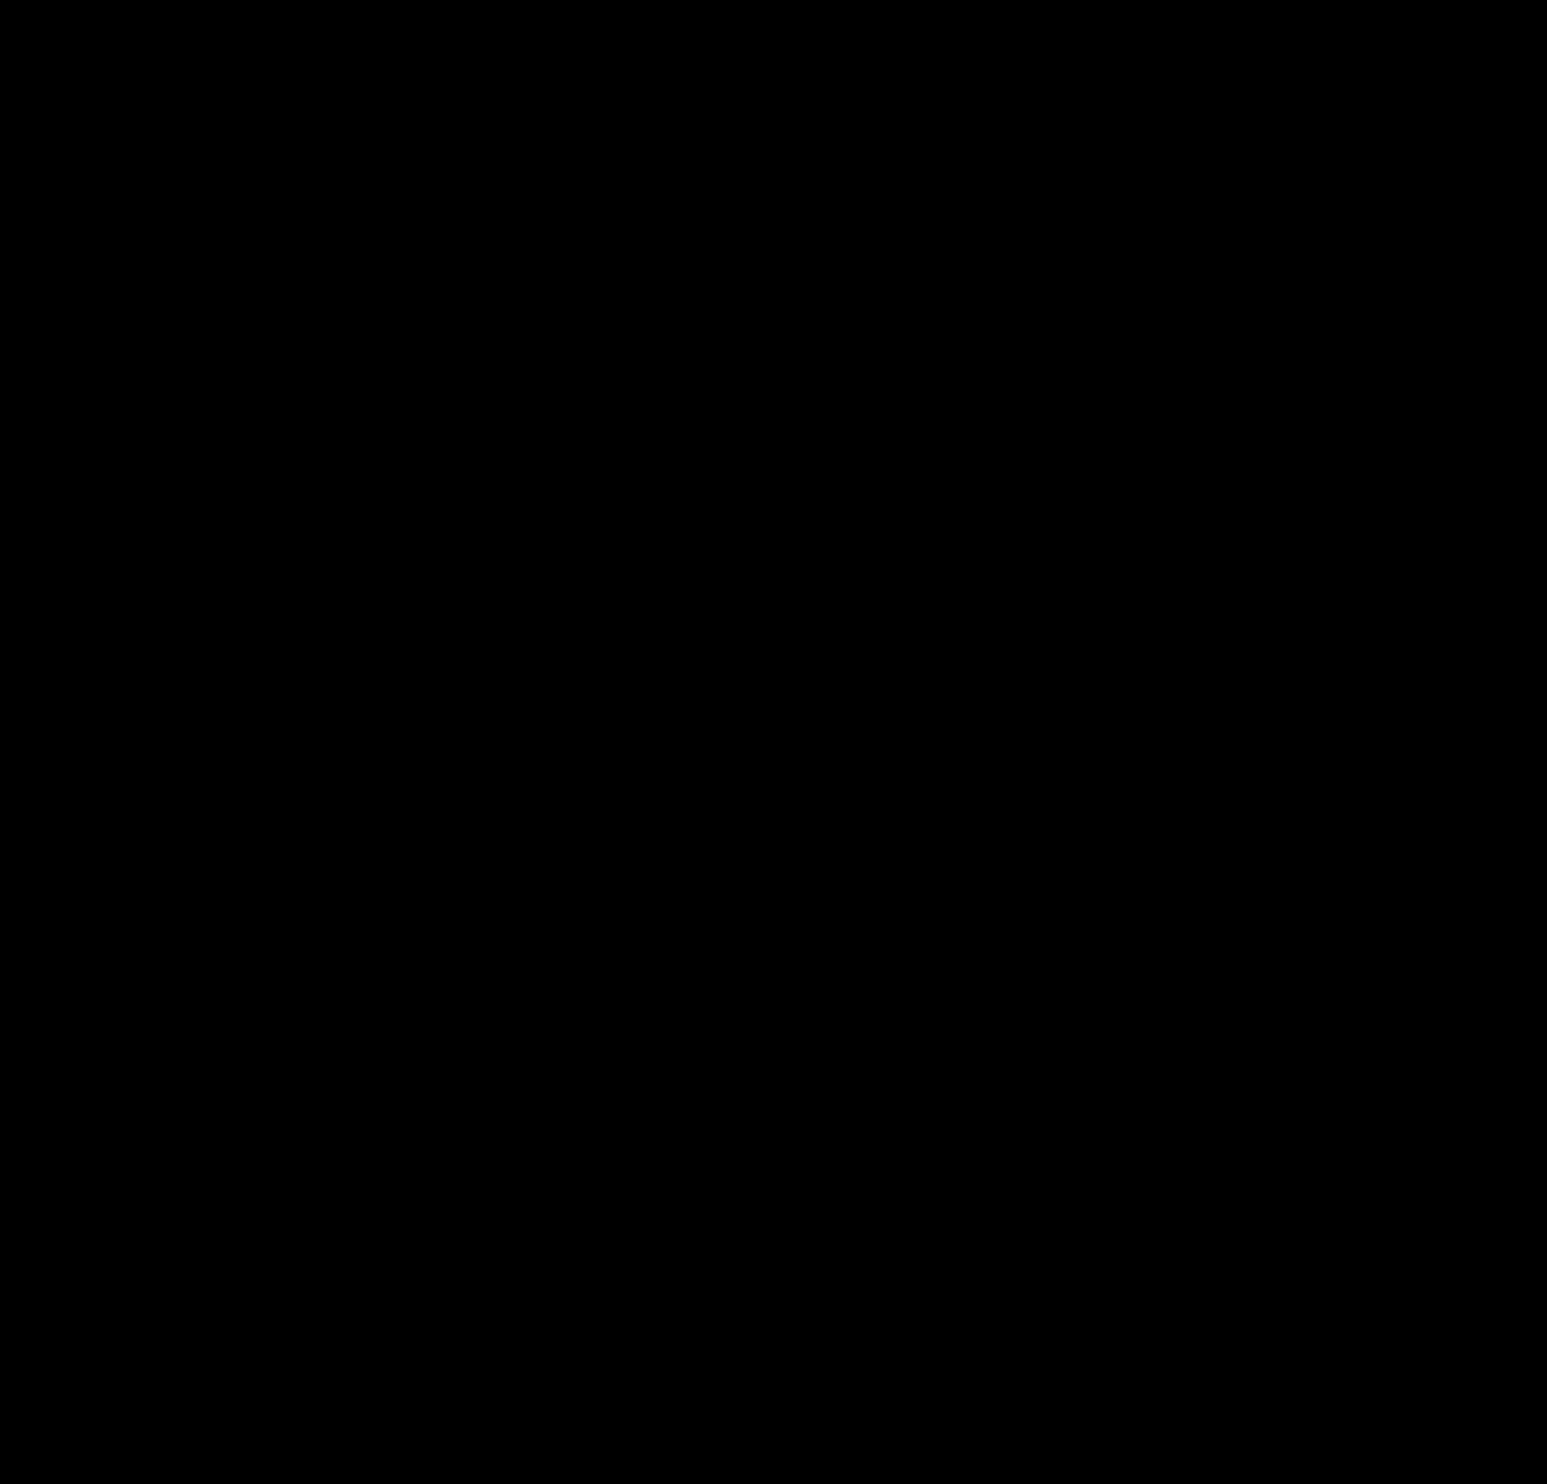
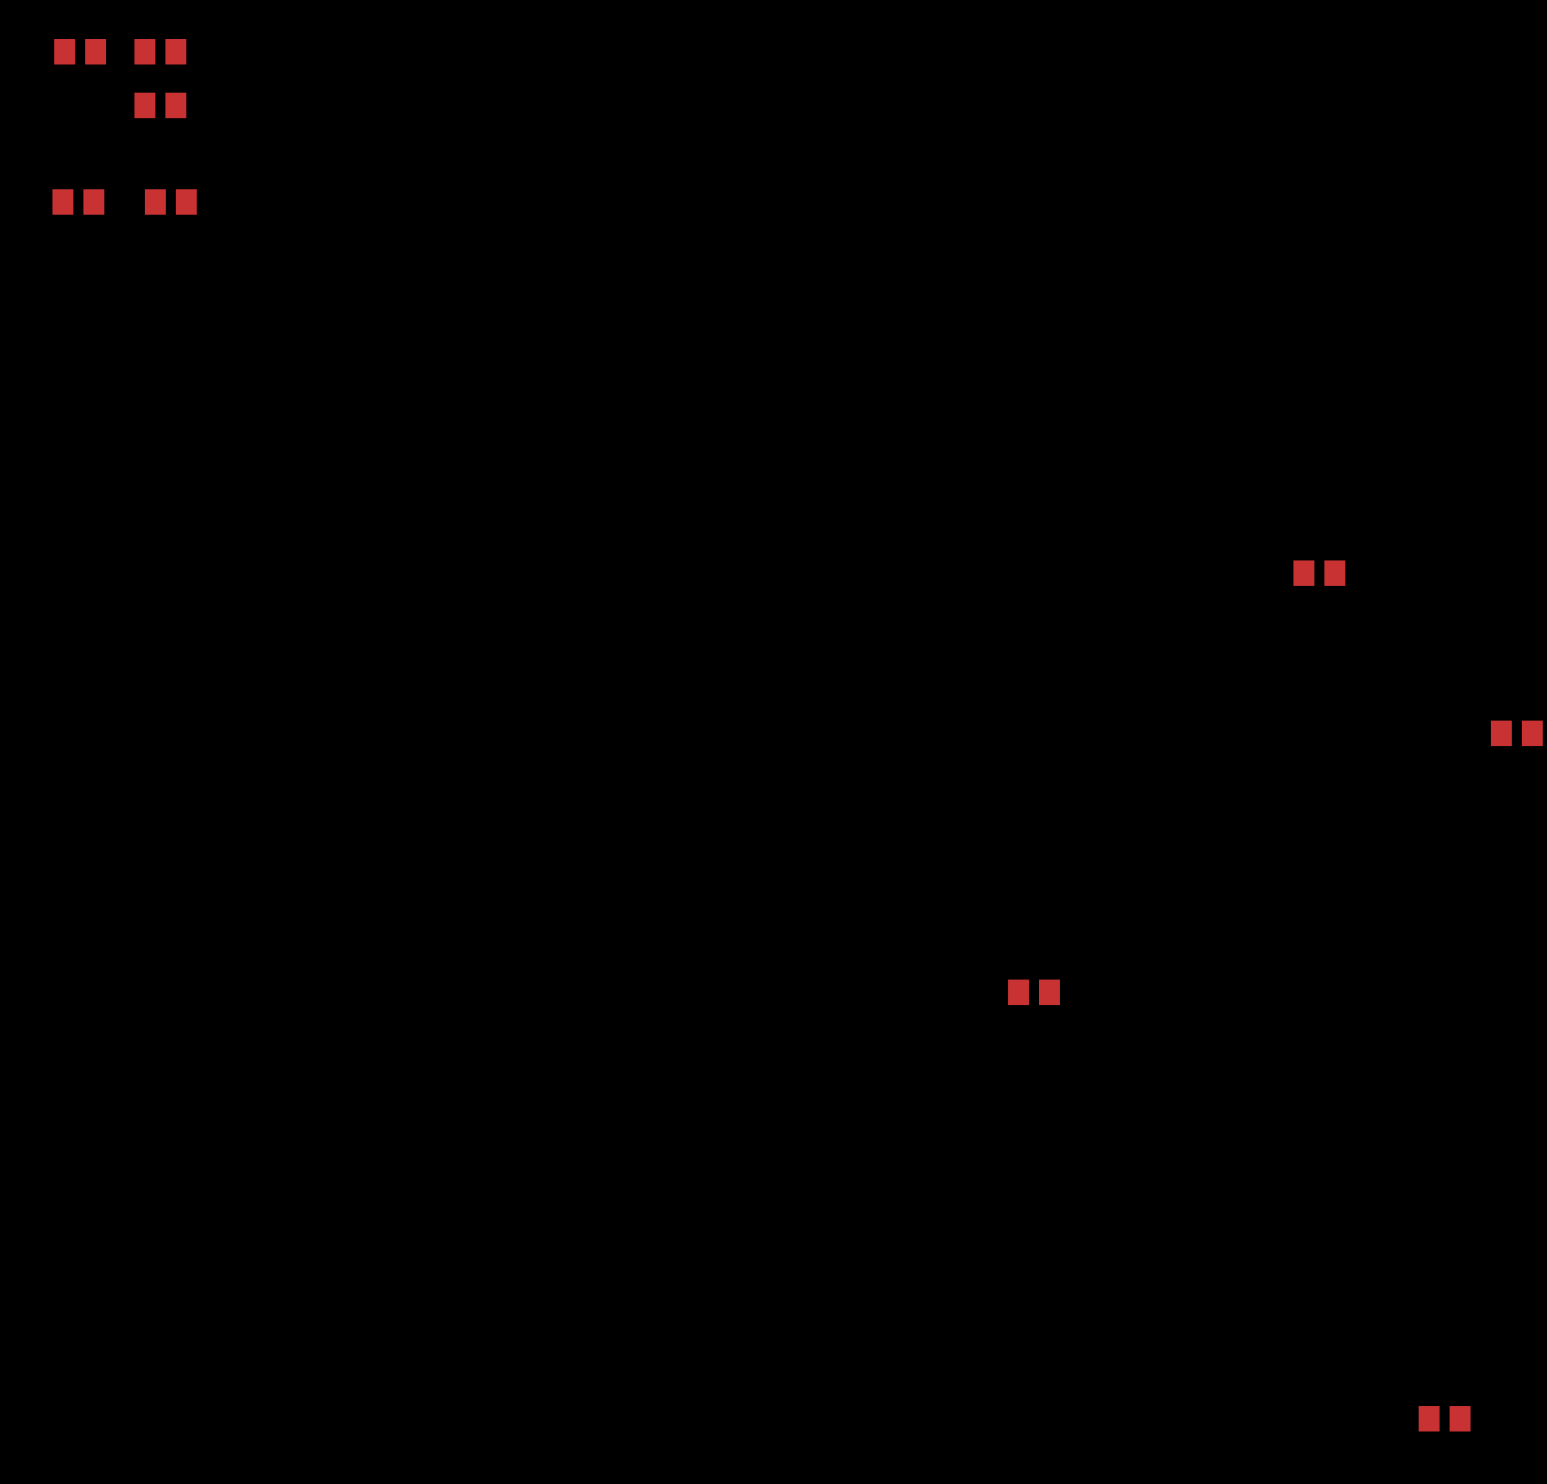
part: none -> (80, 51)
part: none -> (160, 51)
part: none -> (160, 105)
part: none -> (78, 201)
part: none -> (170, 201)
part: none -> (1319, 573)
part: none -> (1516, 733)
part: none -> (1033, 992)
part: none -> (1444, 1418)

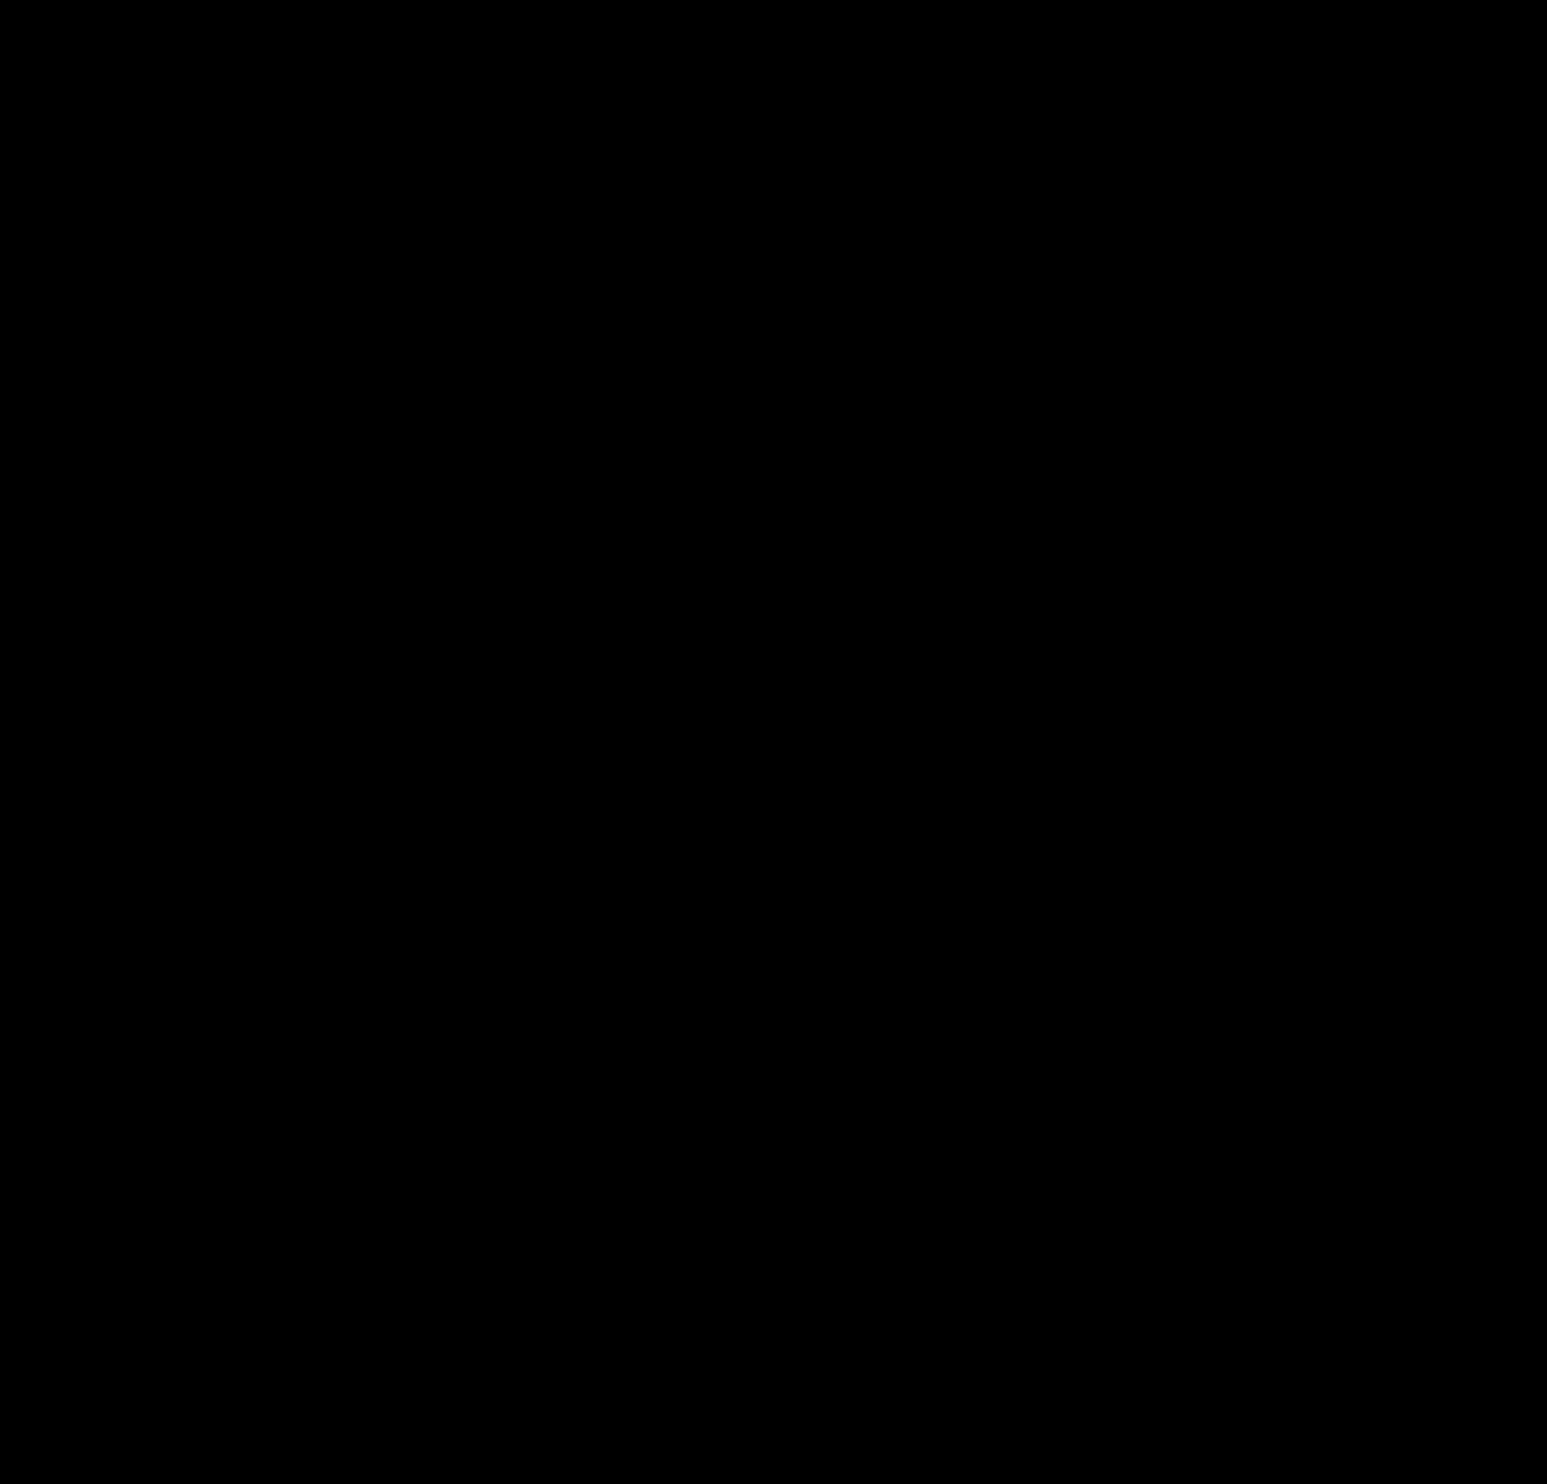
part: (80, 51) -> none
part: (160, 51) -> none
part: (160, 105) -> none
part: (78, 201) -> none
part: (170, 201) -> none
part: (1319, 573) -> none
part: (1516, 733) -> none
part: (1033, 992) -> none
part: (1444, 1418) -> none

